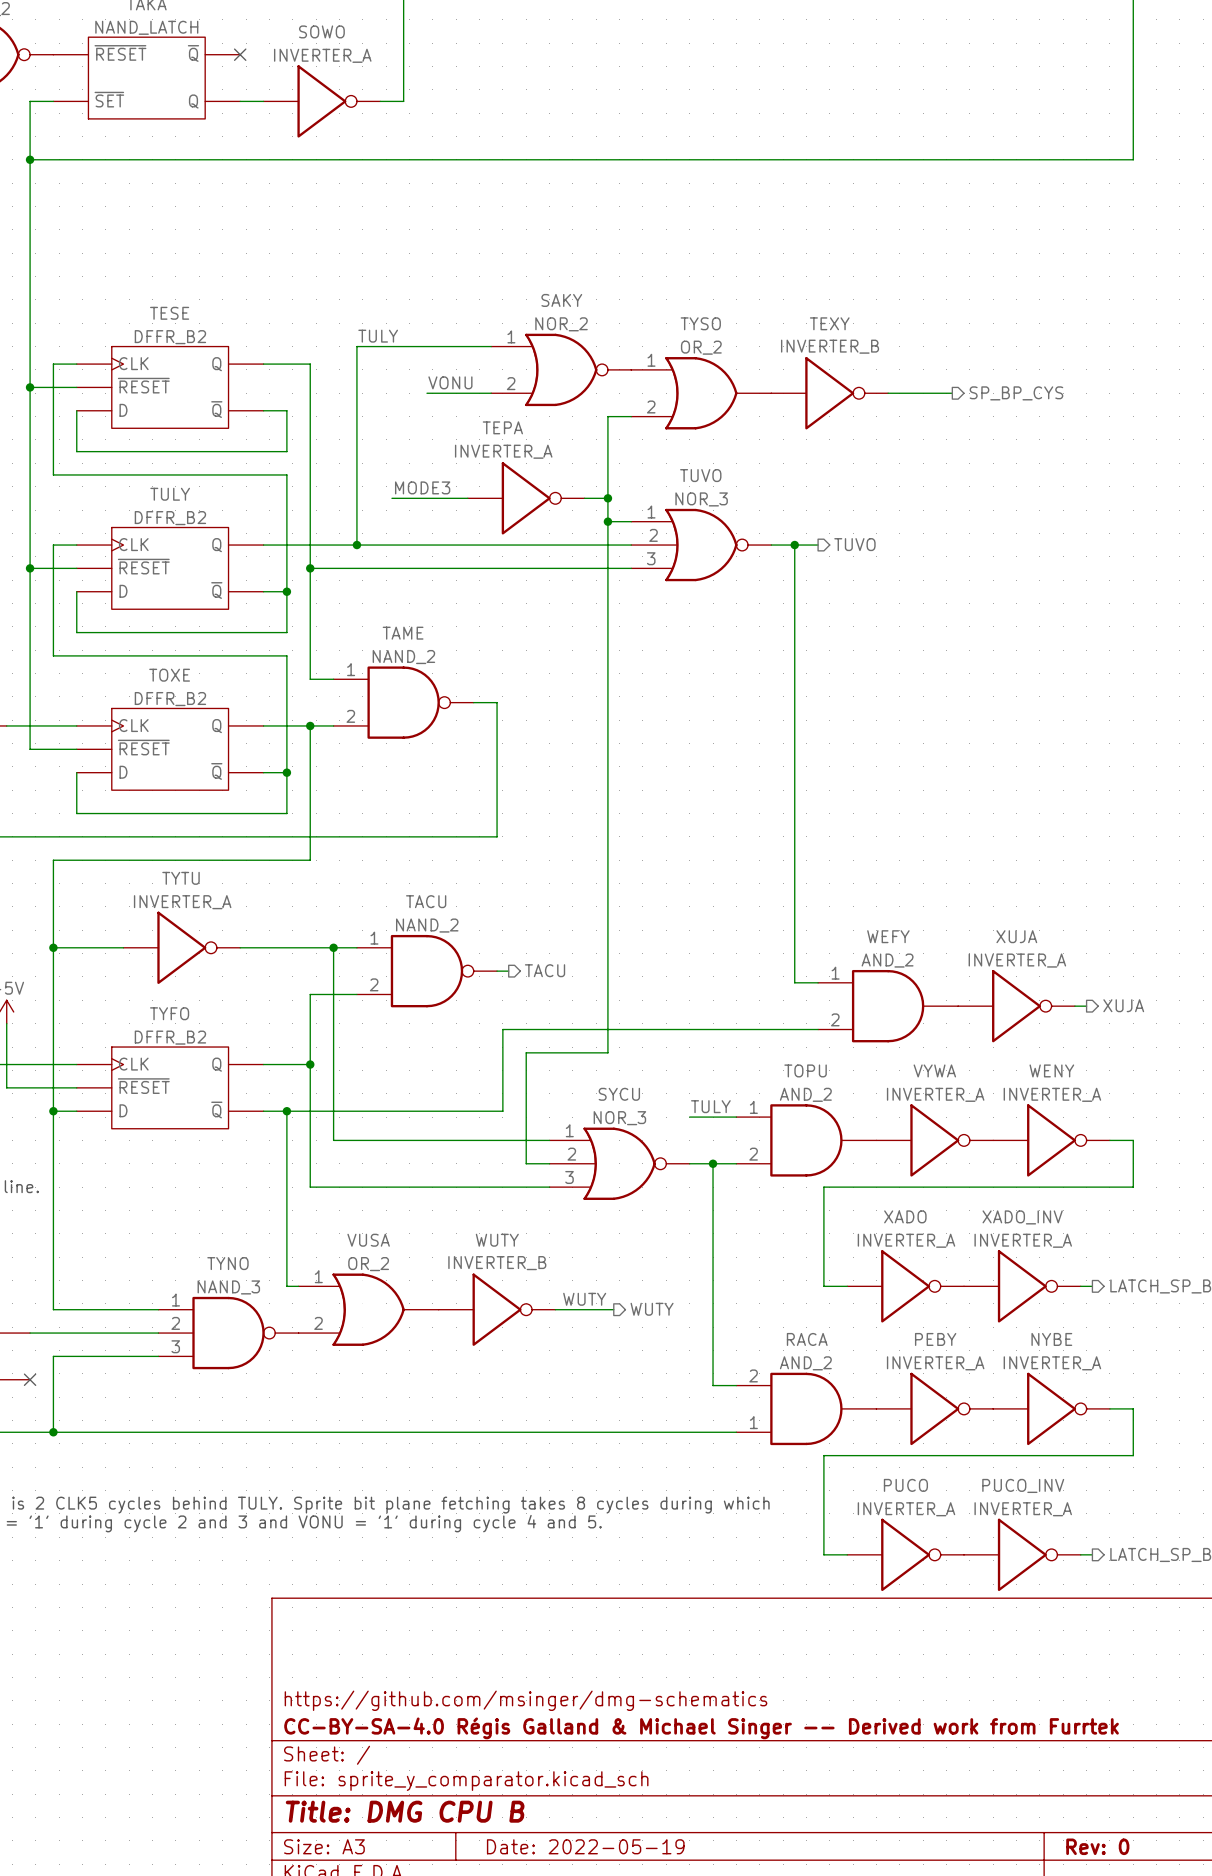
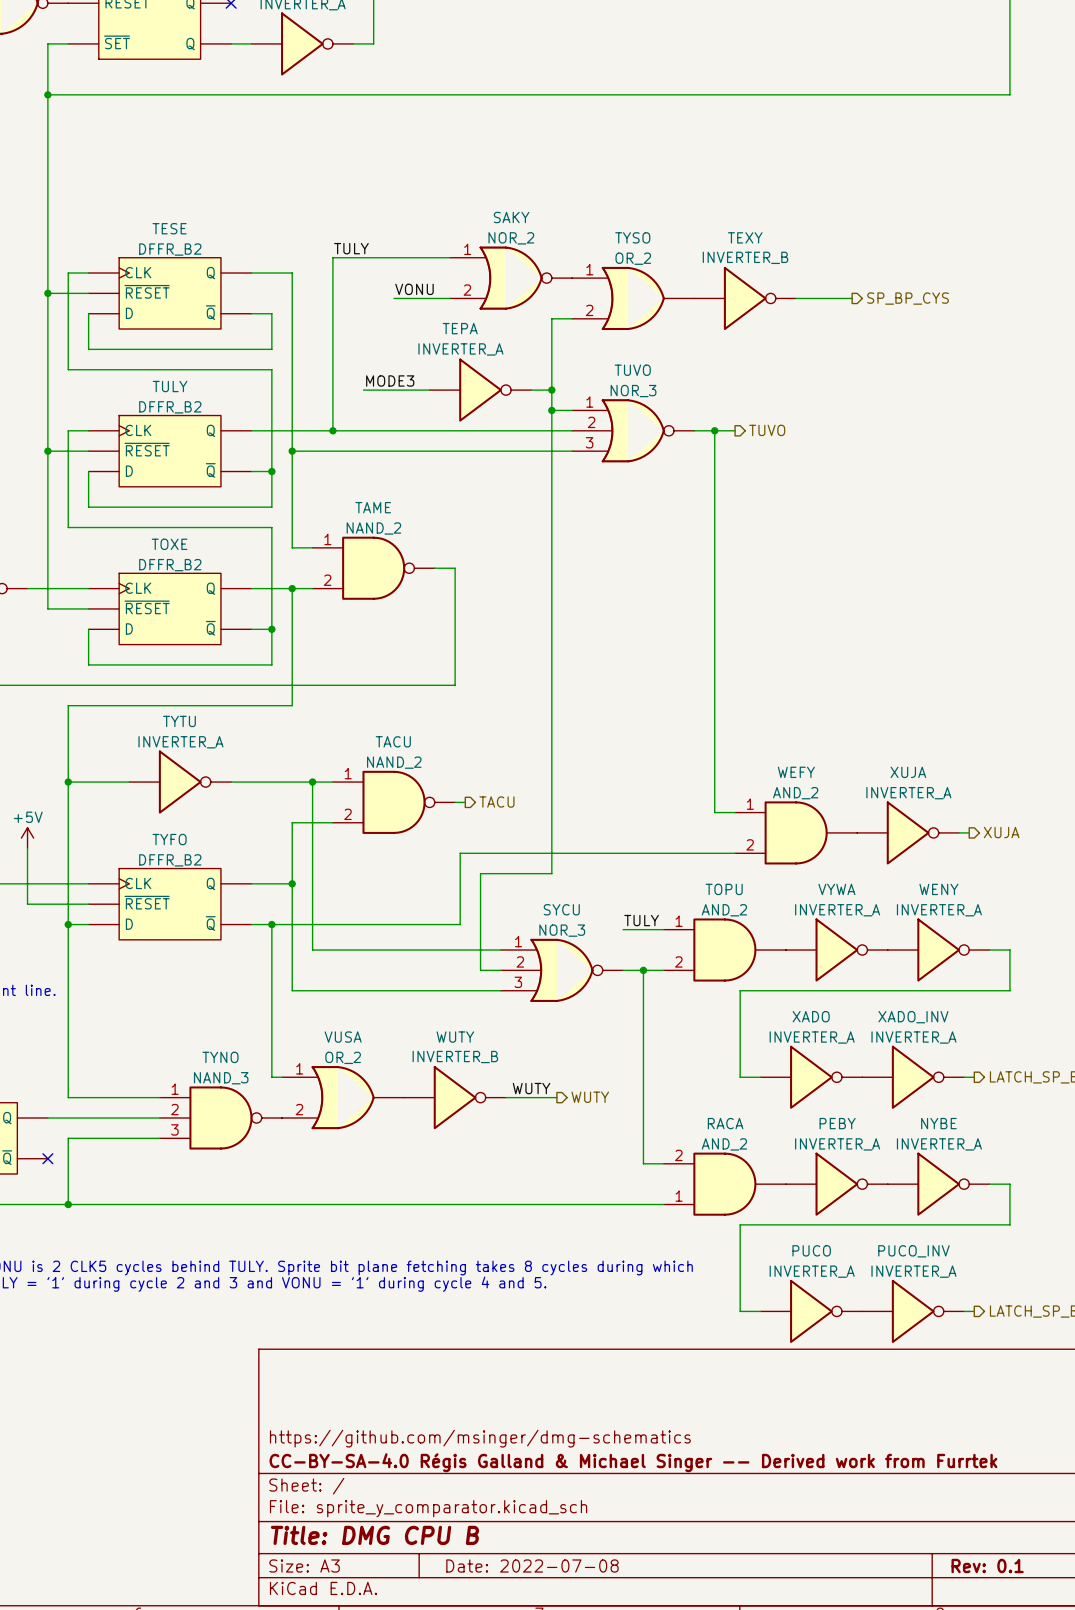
title block: Date: 2022-05-19 (585, 1846) -> Date: 2022-07-08 (532, 1566)
title block: Rev: 0 (1097, 1846) -> Rev: 0.1 (987, 1566)

